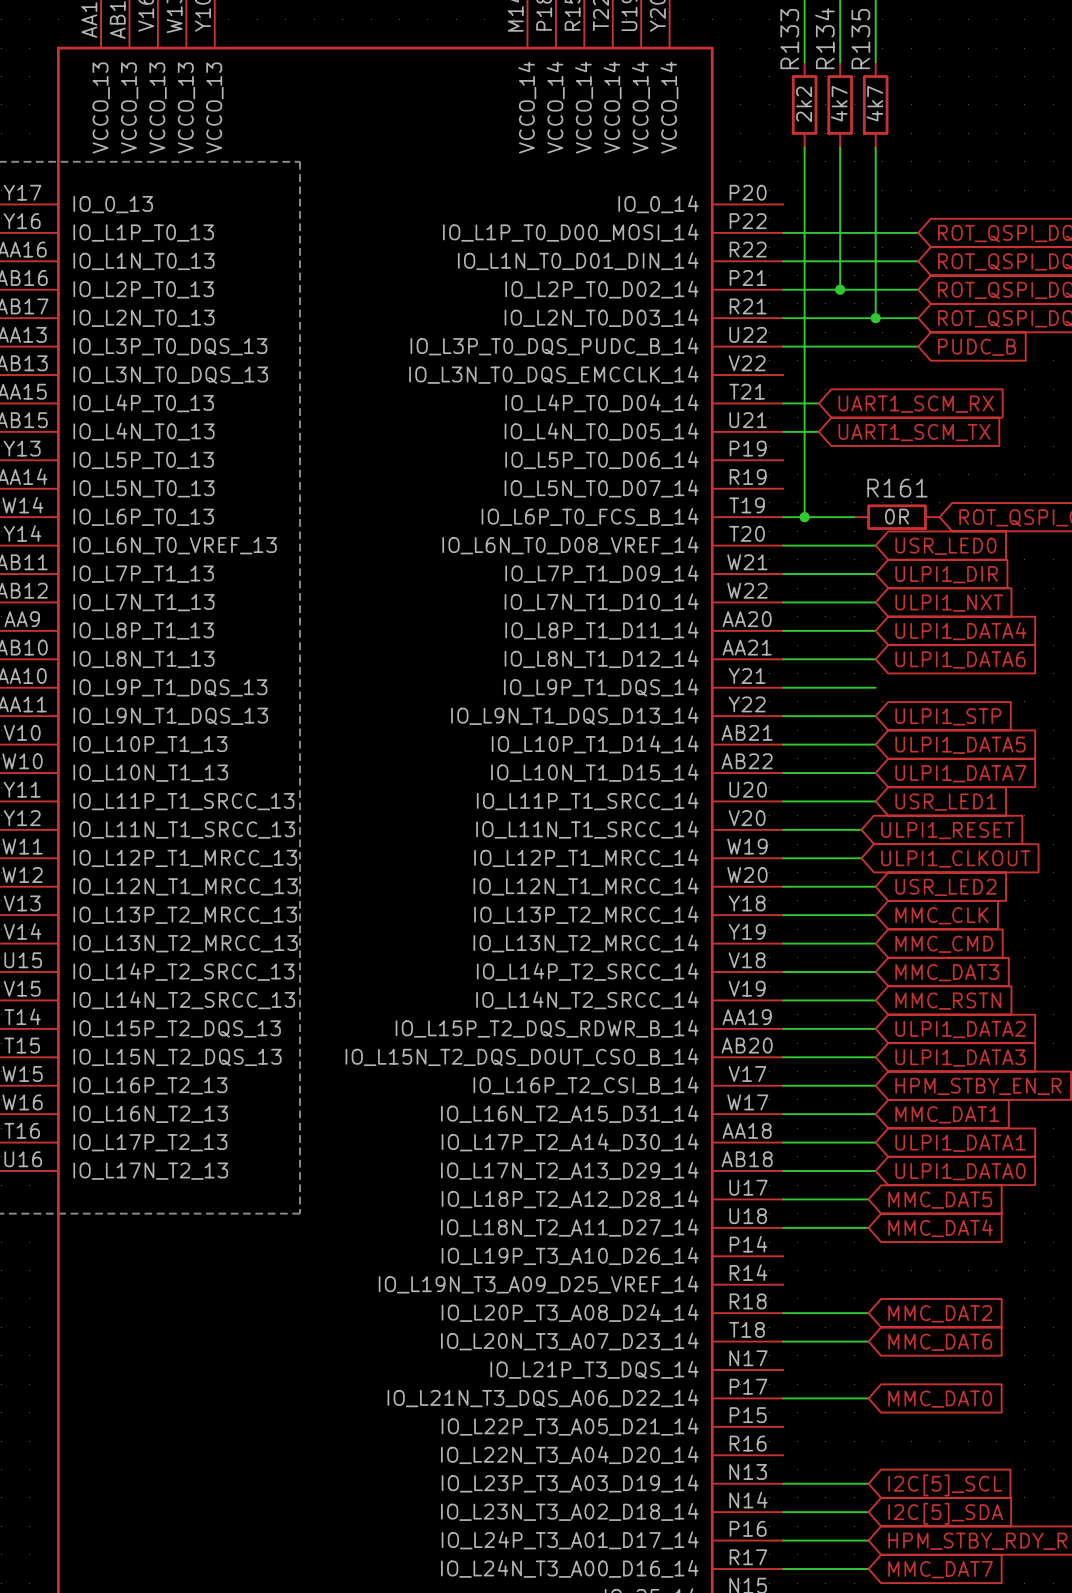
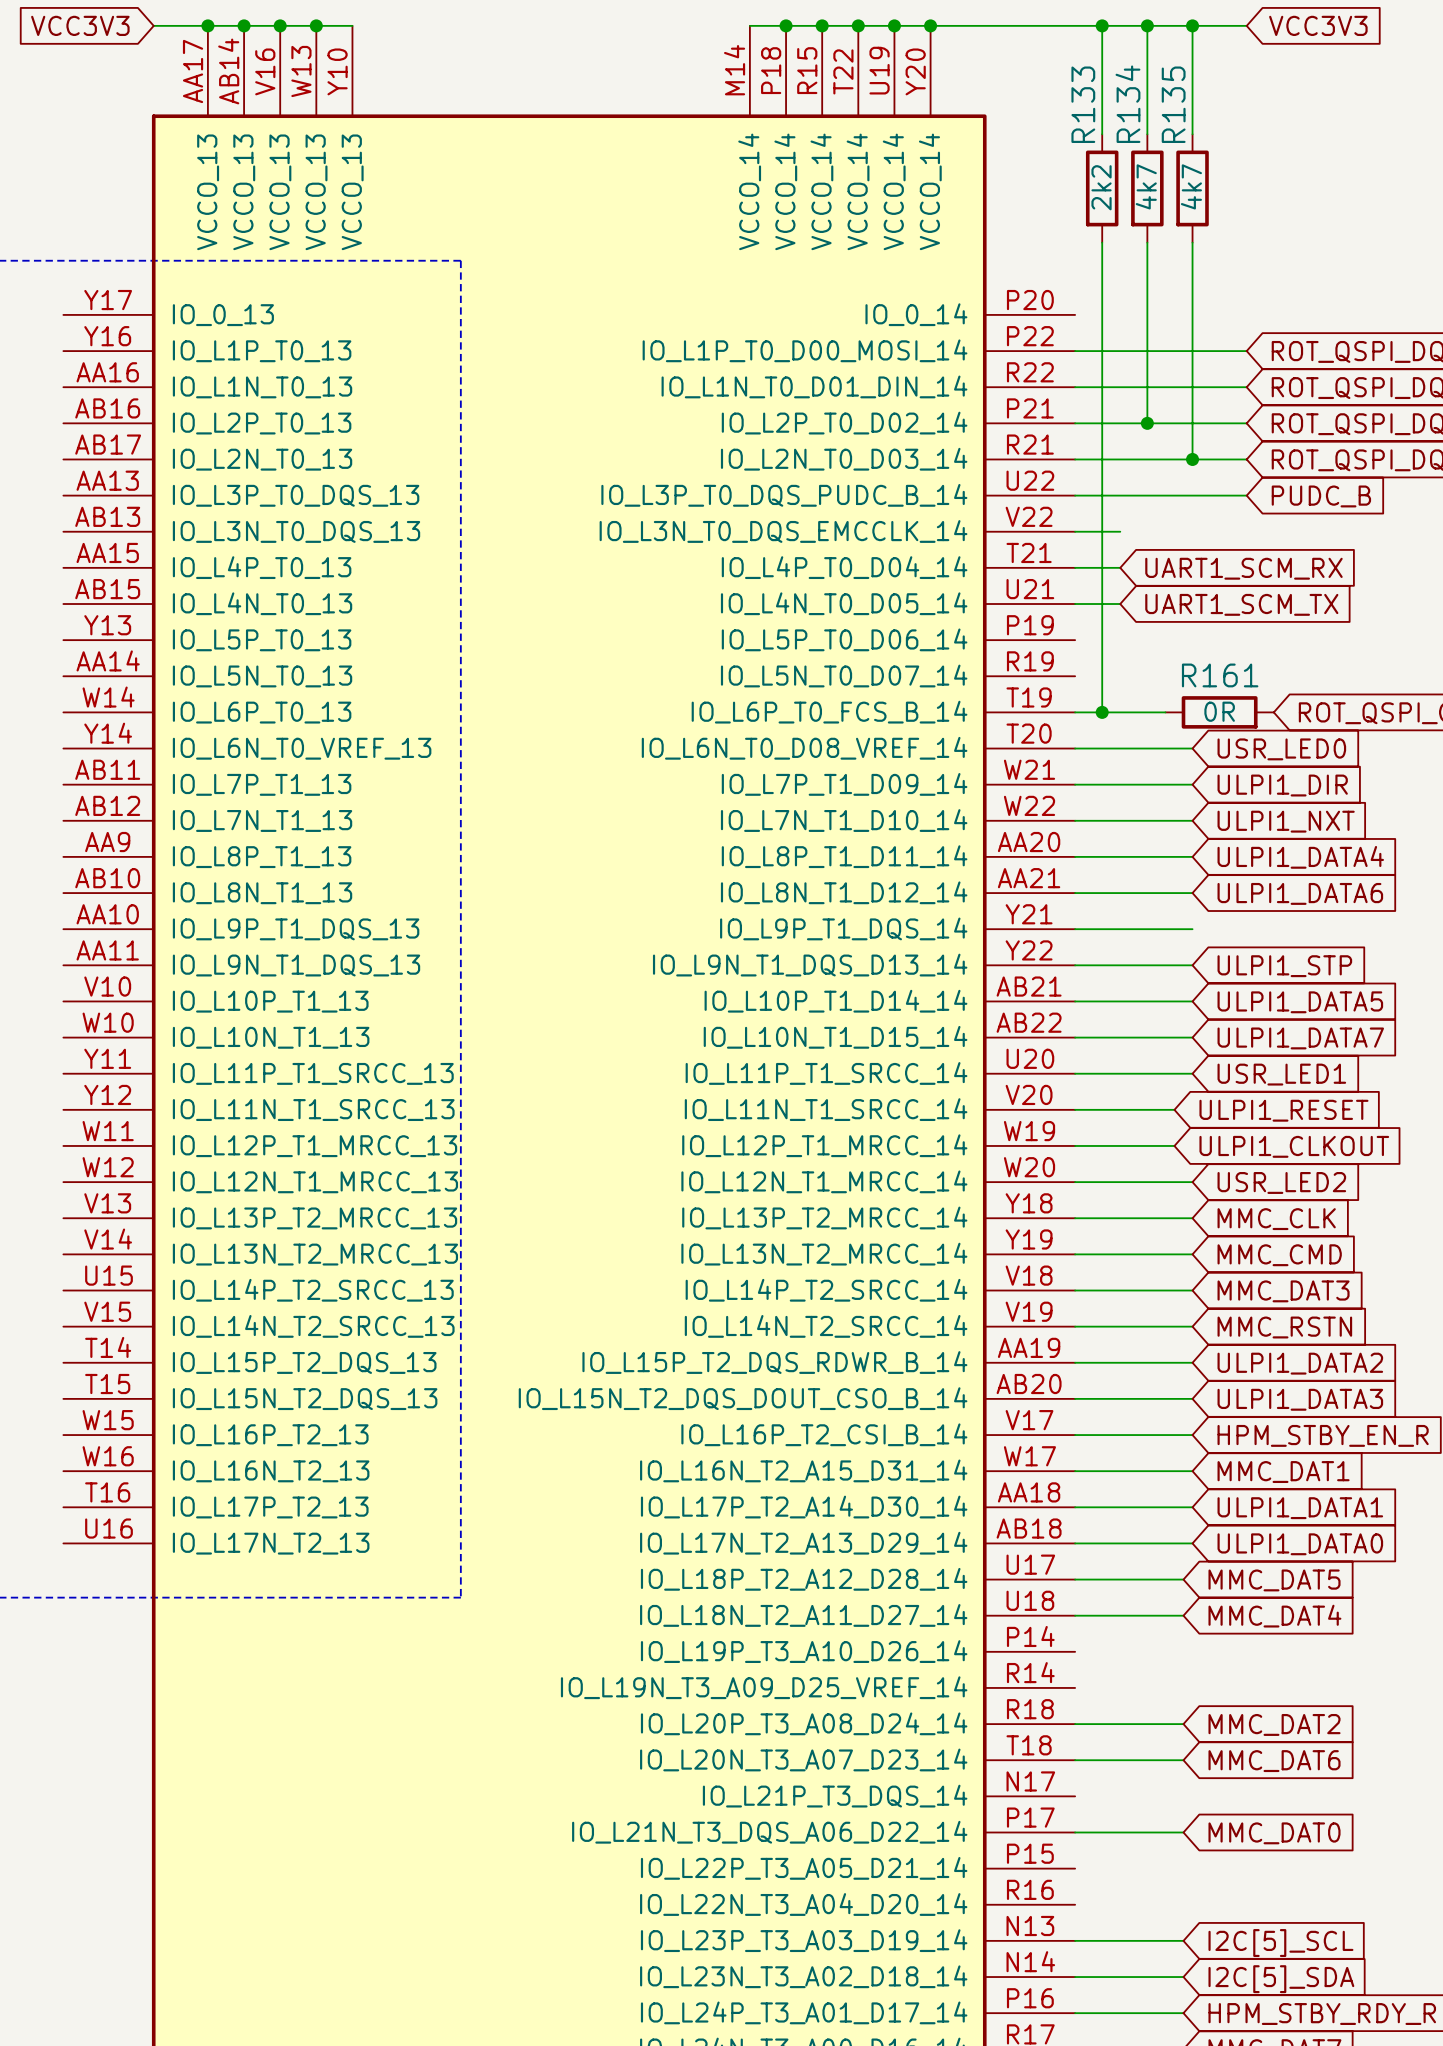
wire: none -> (1075, 531) (1120, 531)

